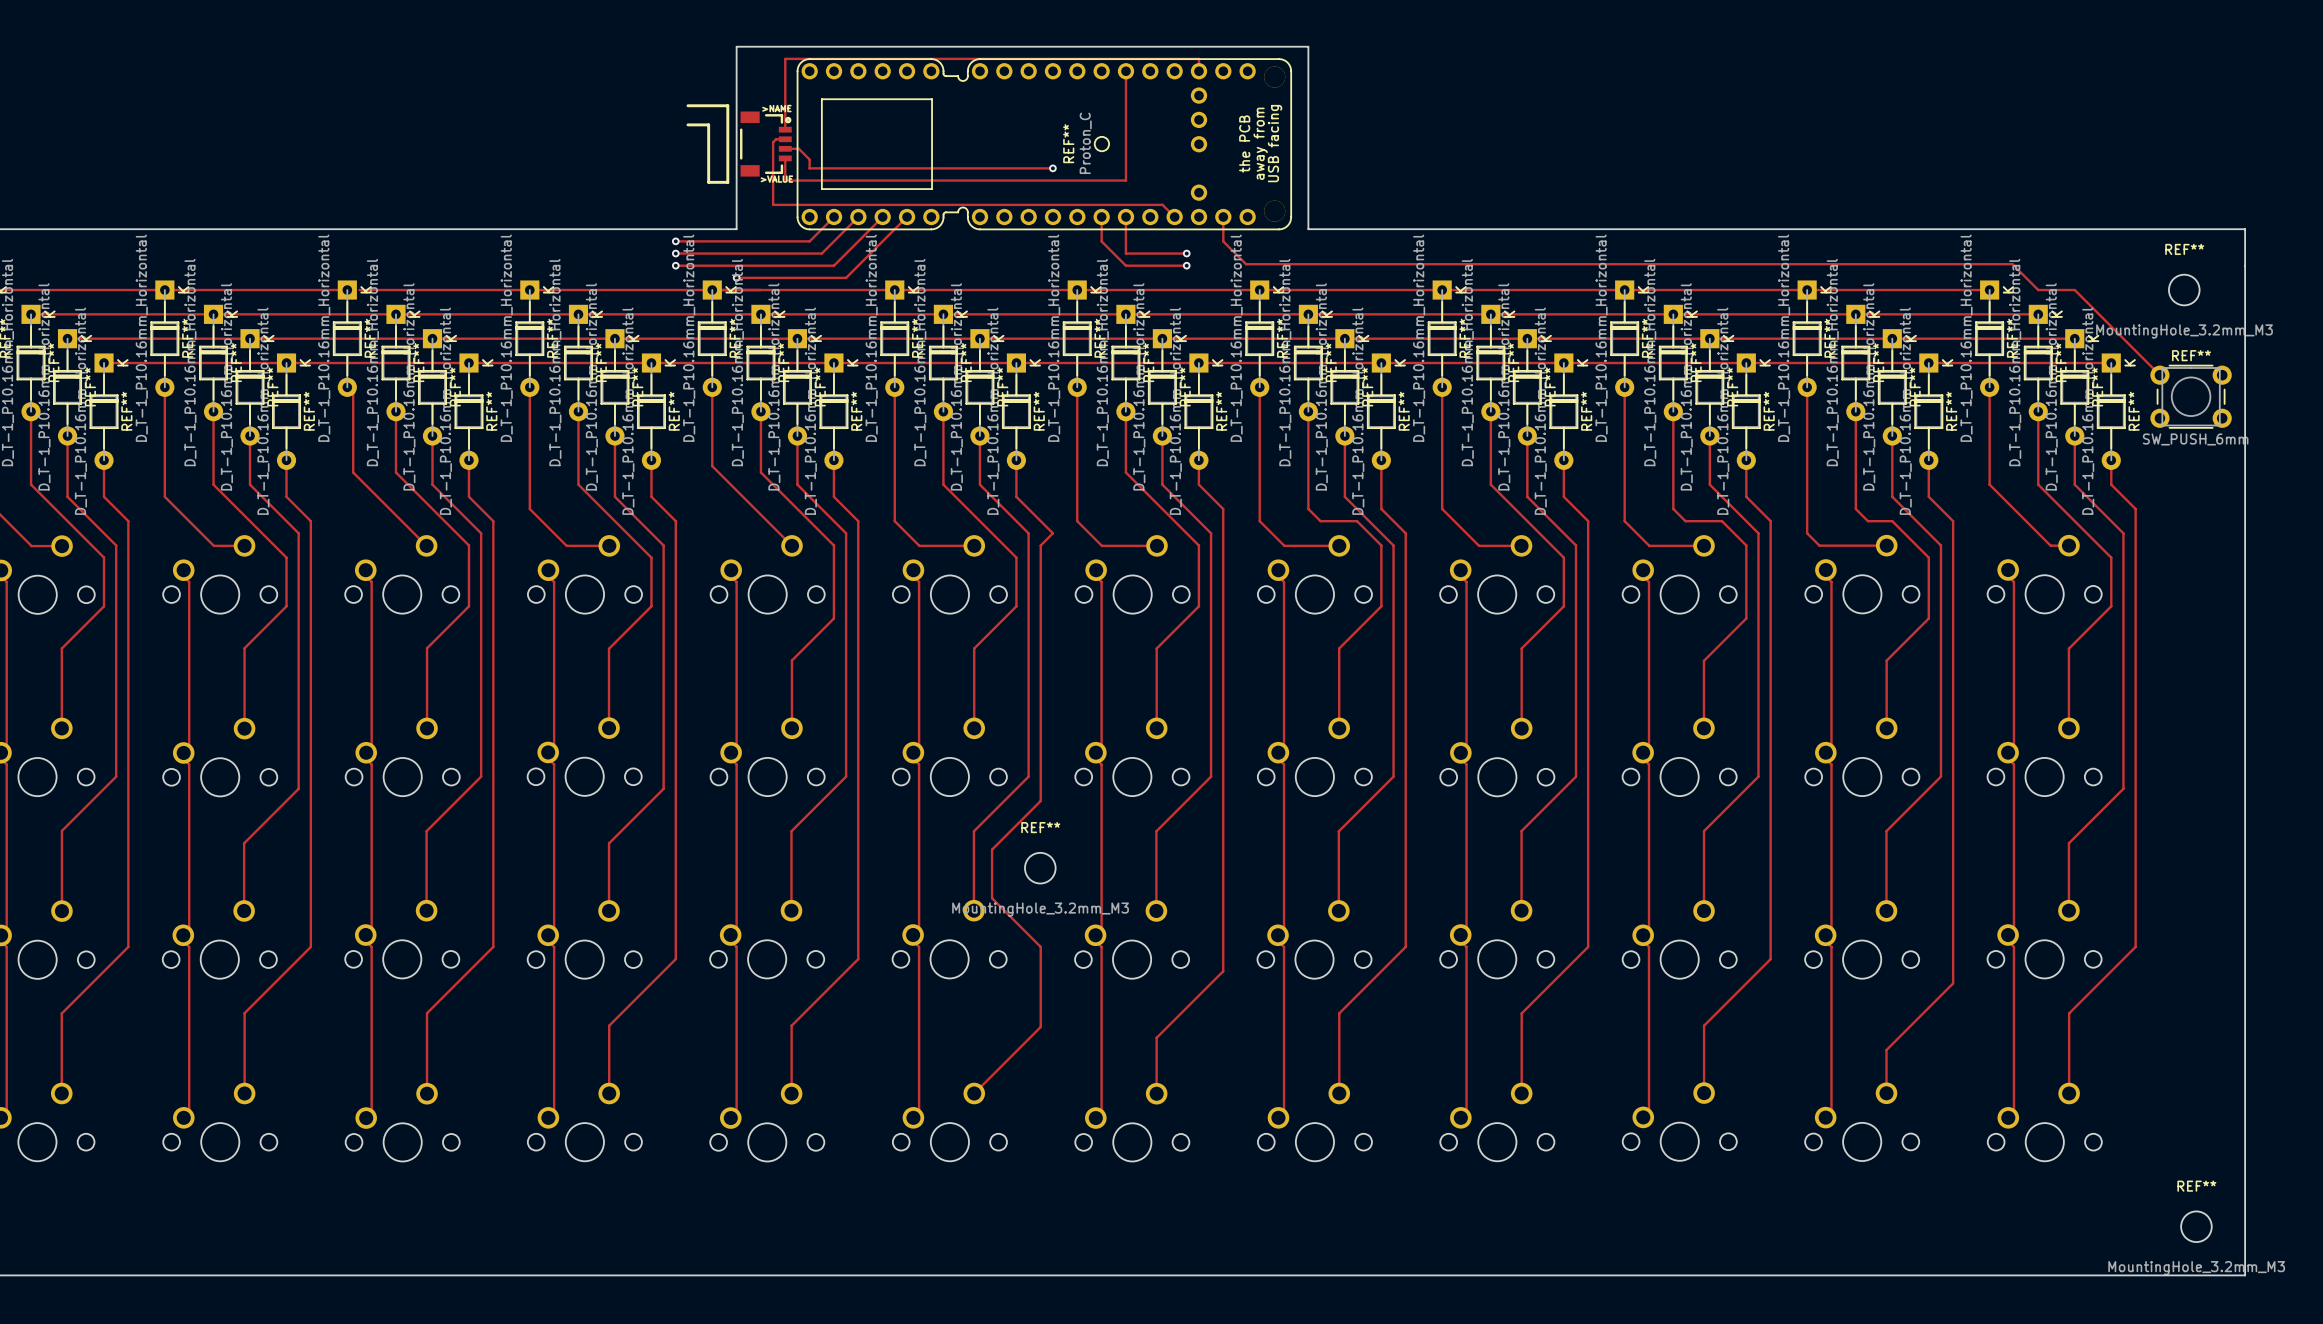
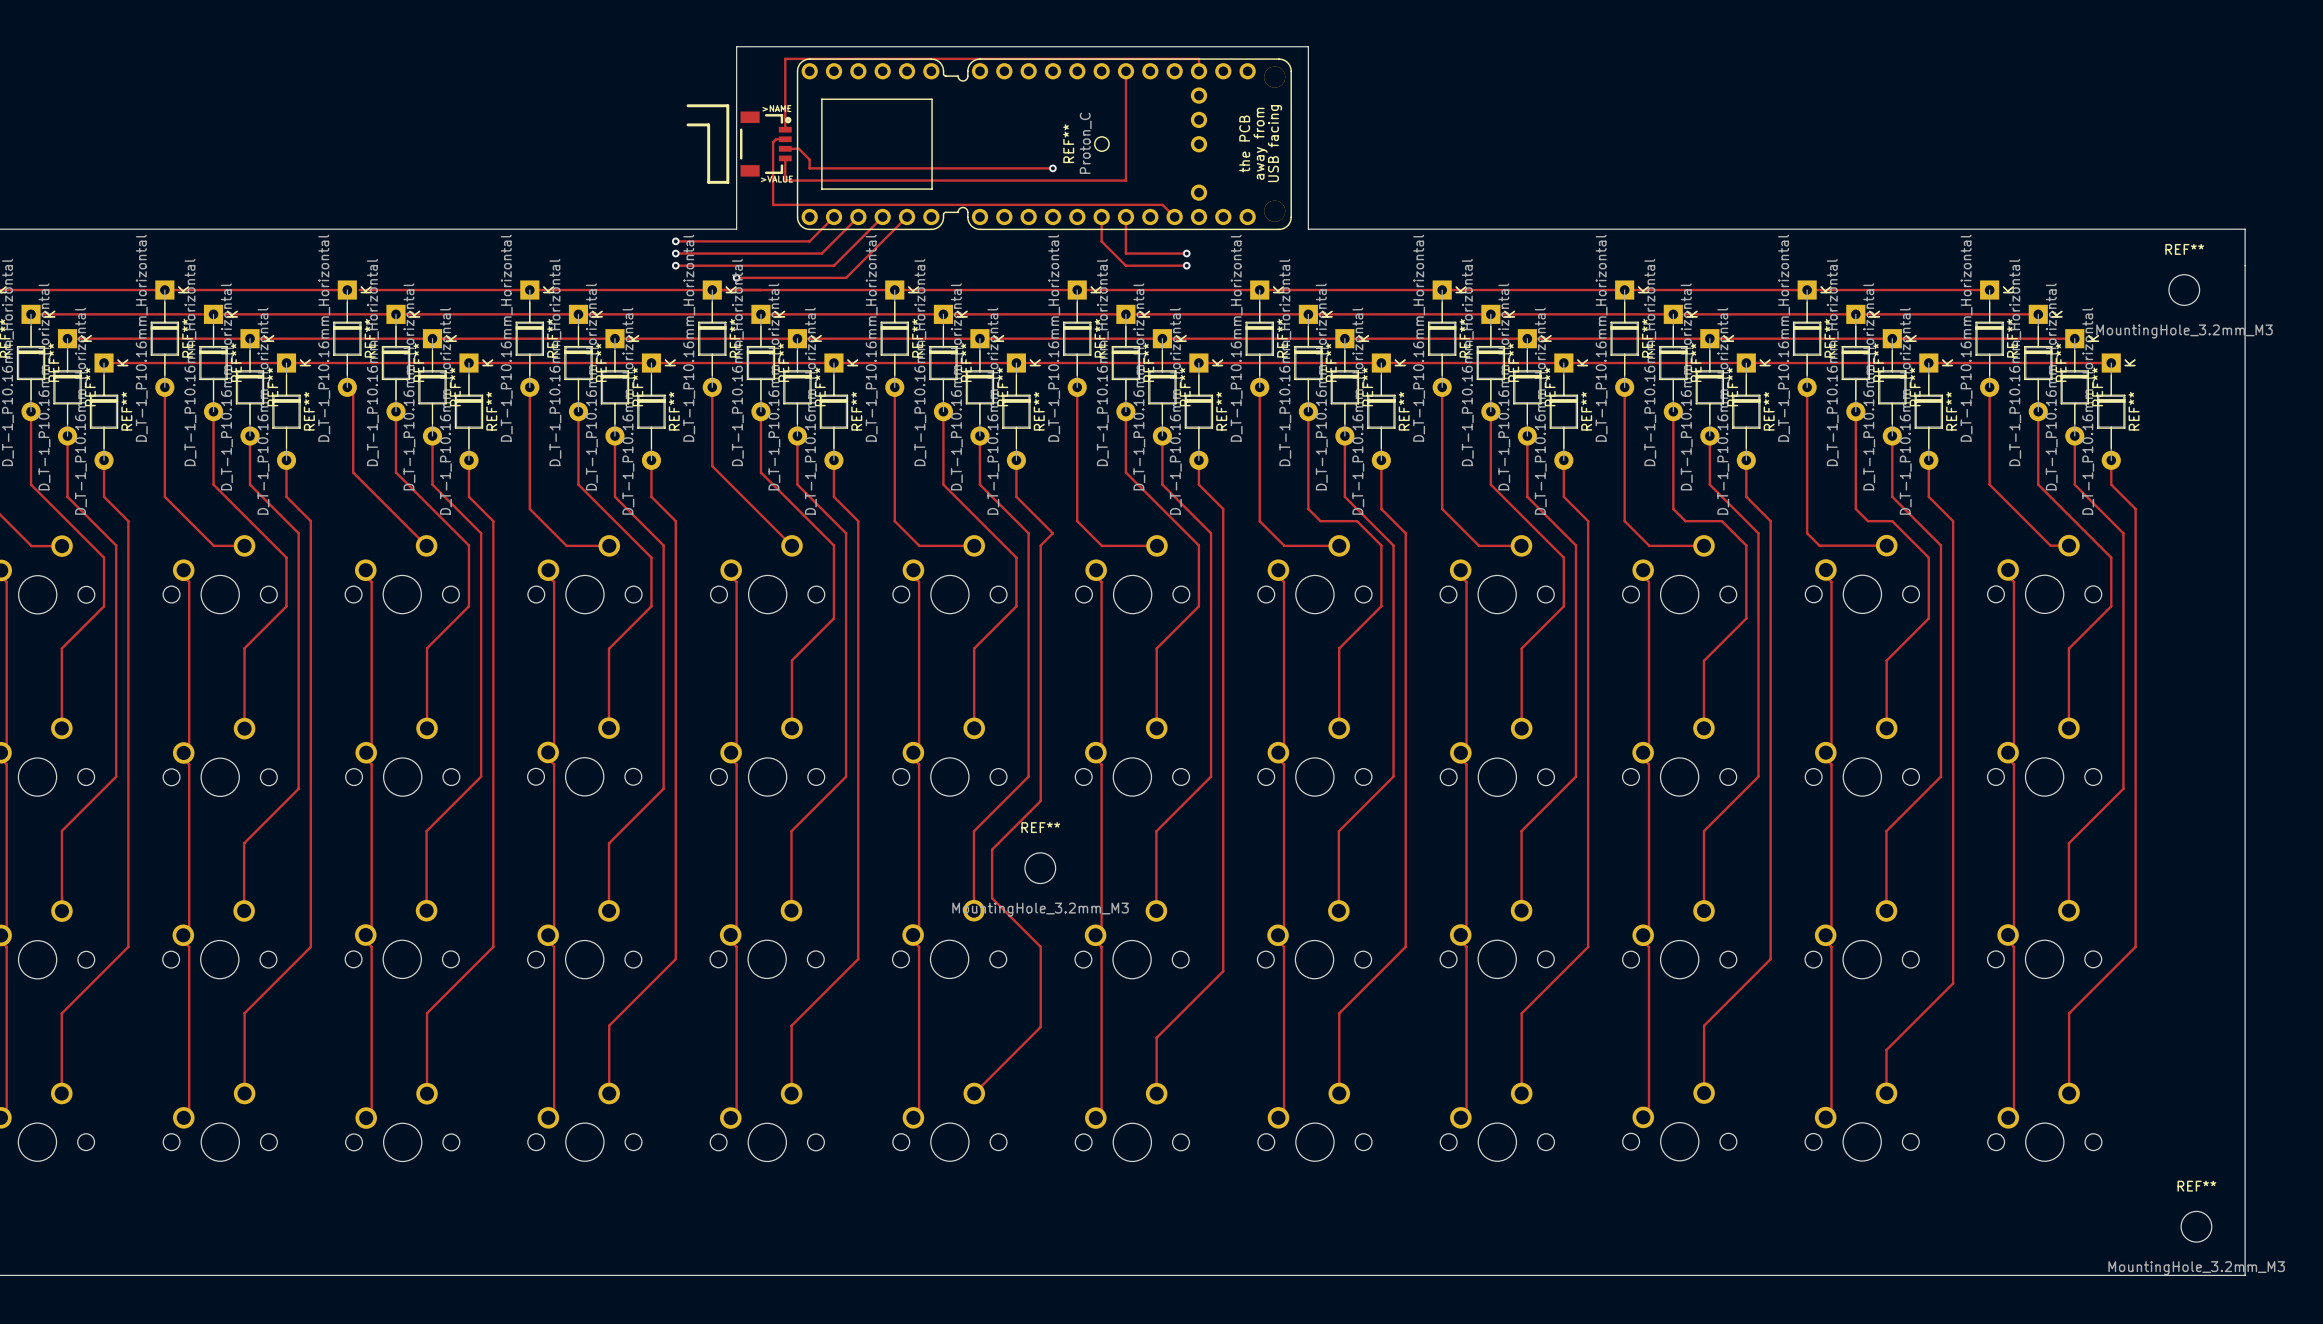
track: (1223, 216) (1223, 241) (1246, 264) (2012, 264) (2038, 290) (2074, 290) (2159, 375) -> none
REF**: SW_PUSH_6mm (2191, 396) -> none

